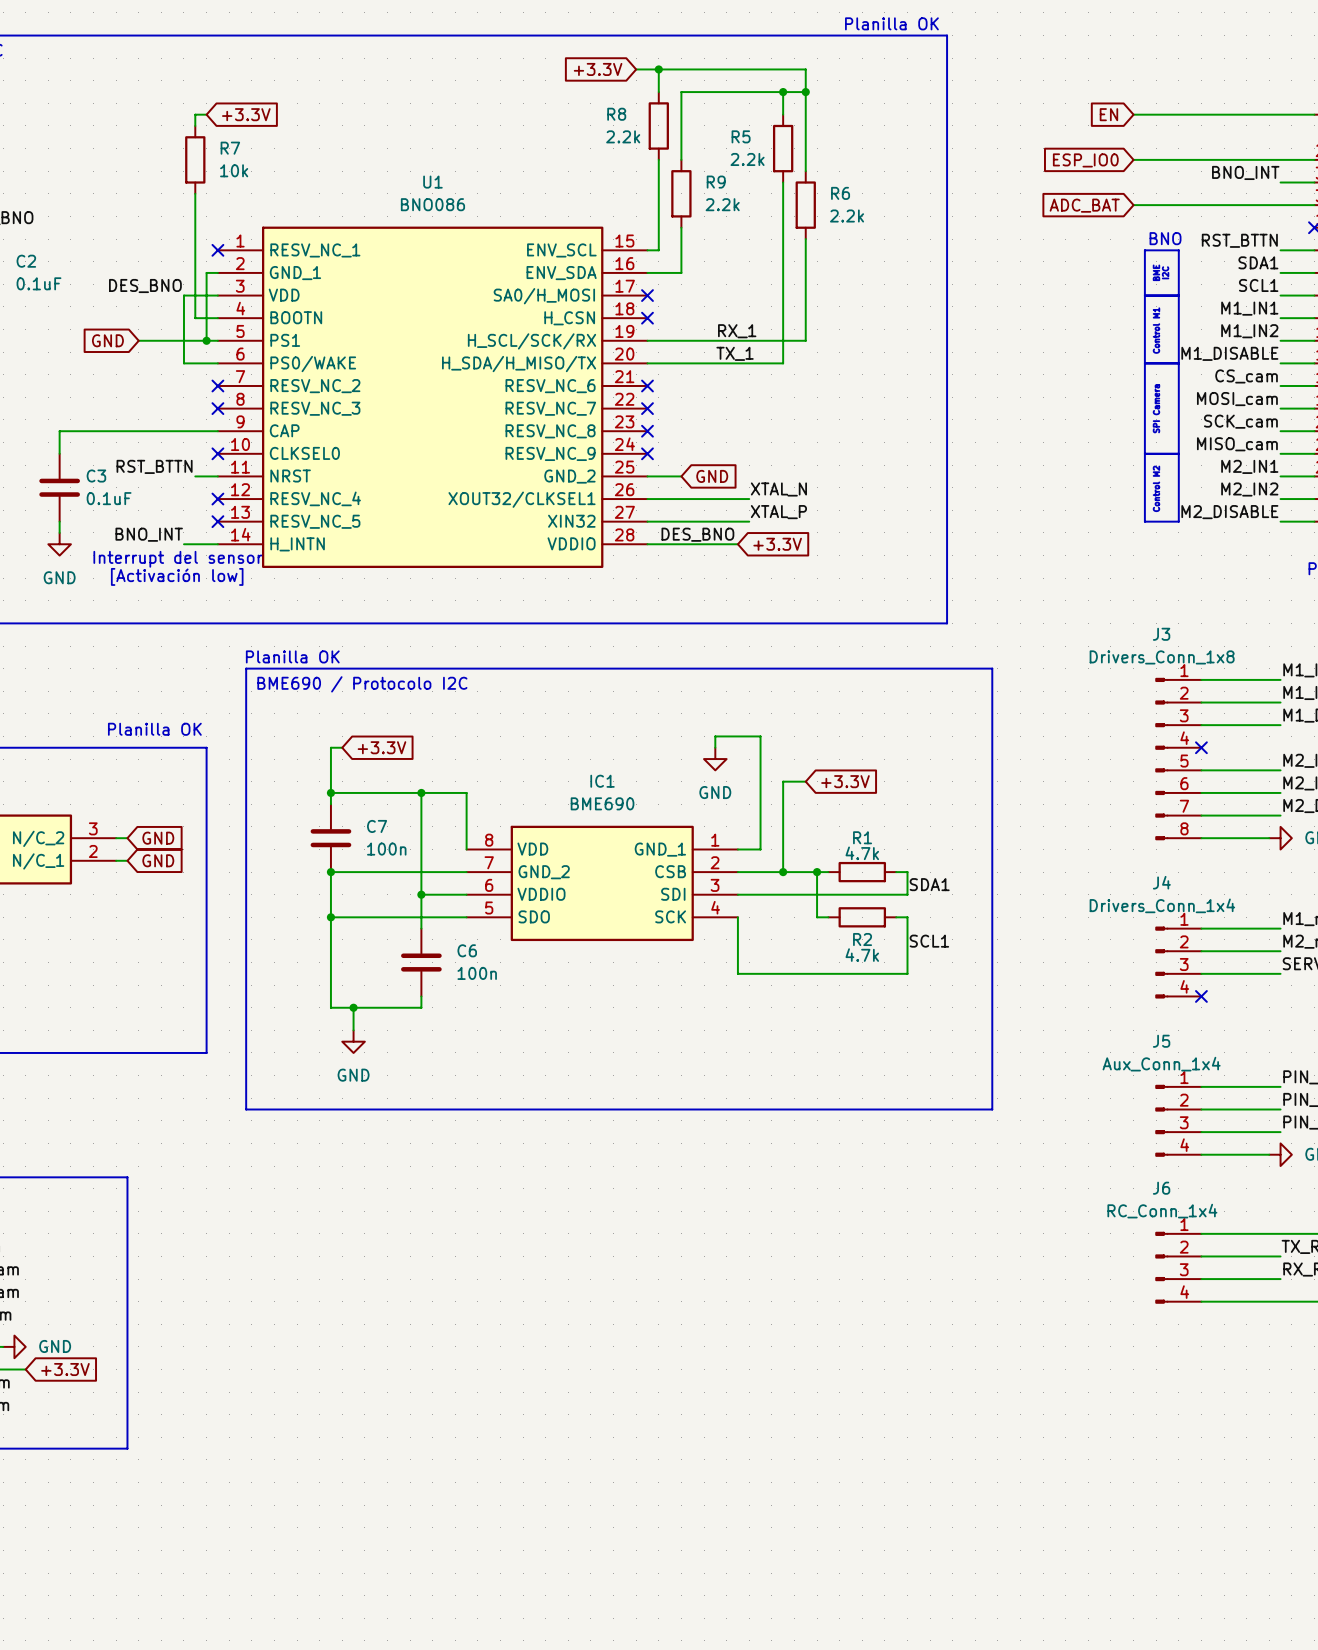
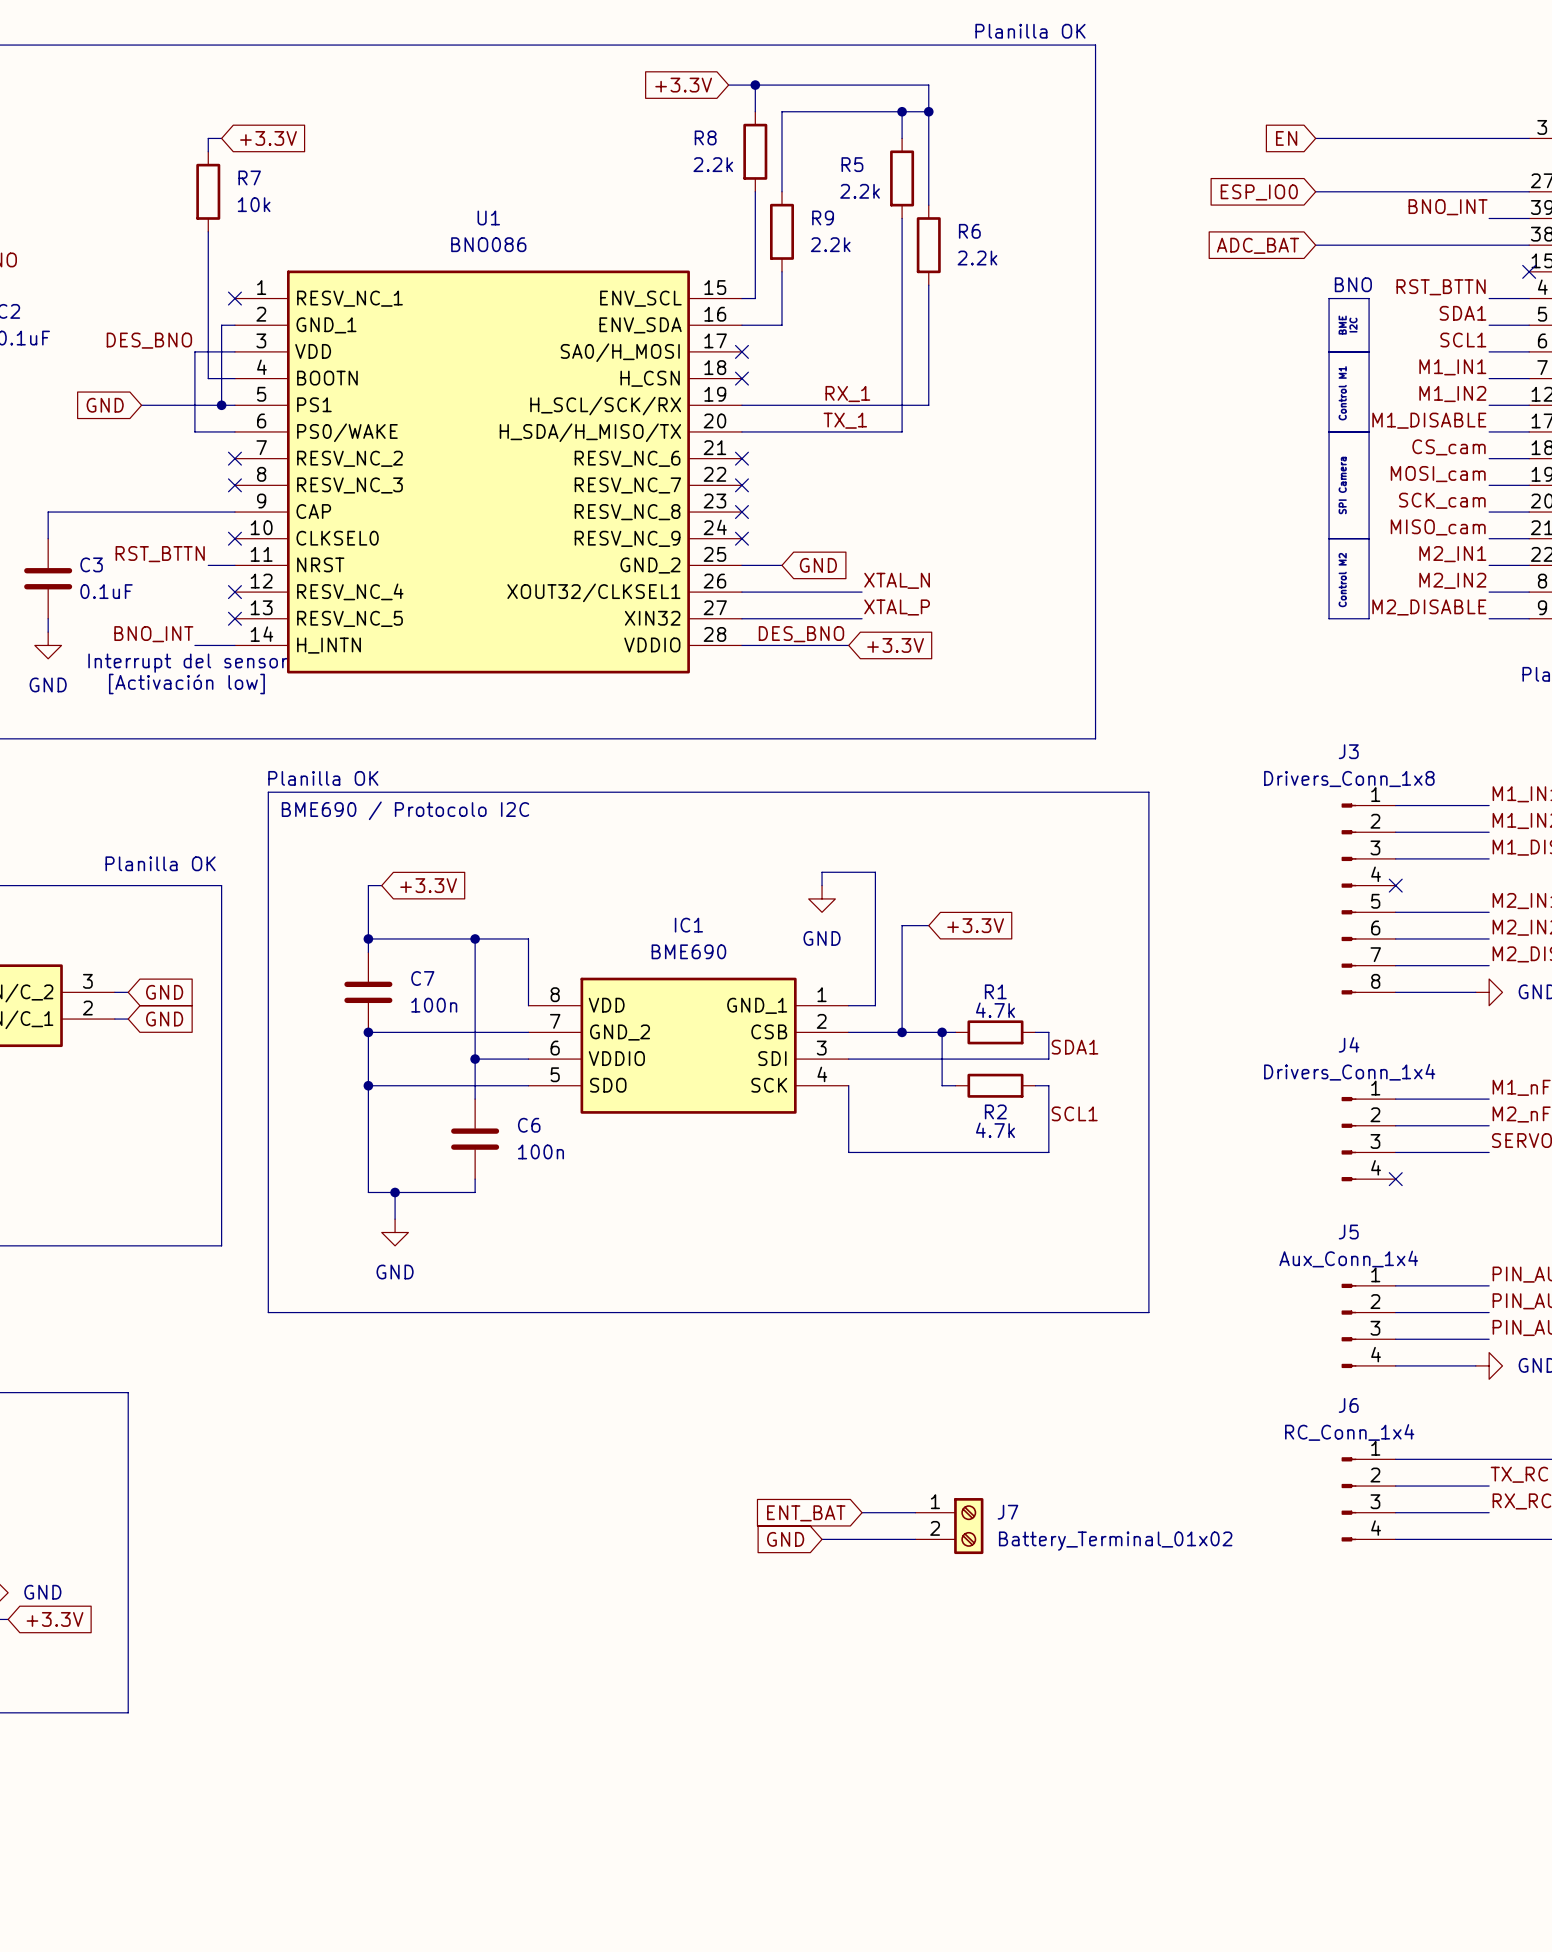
global label: none -> ENT_BAT (806, 1513)
wire: none -> (862, 1512) (915, 1512)
J7: none -> Battery_Terminal_01x02 (949, 1526)
global label: none -> GND (785, 1539)
wire: none -> (822, 1539) (915, 1539)

